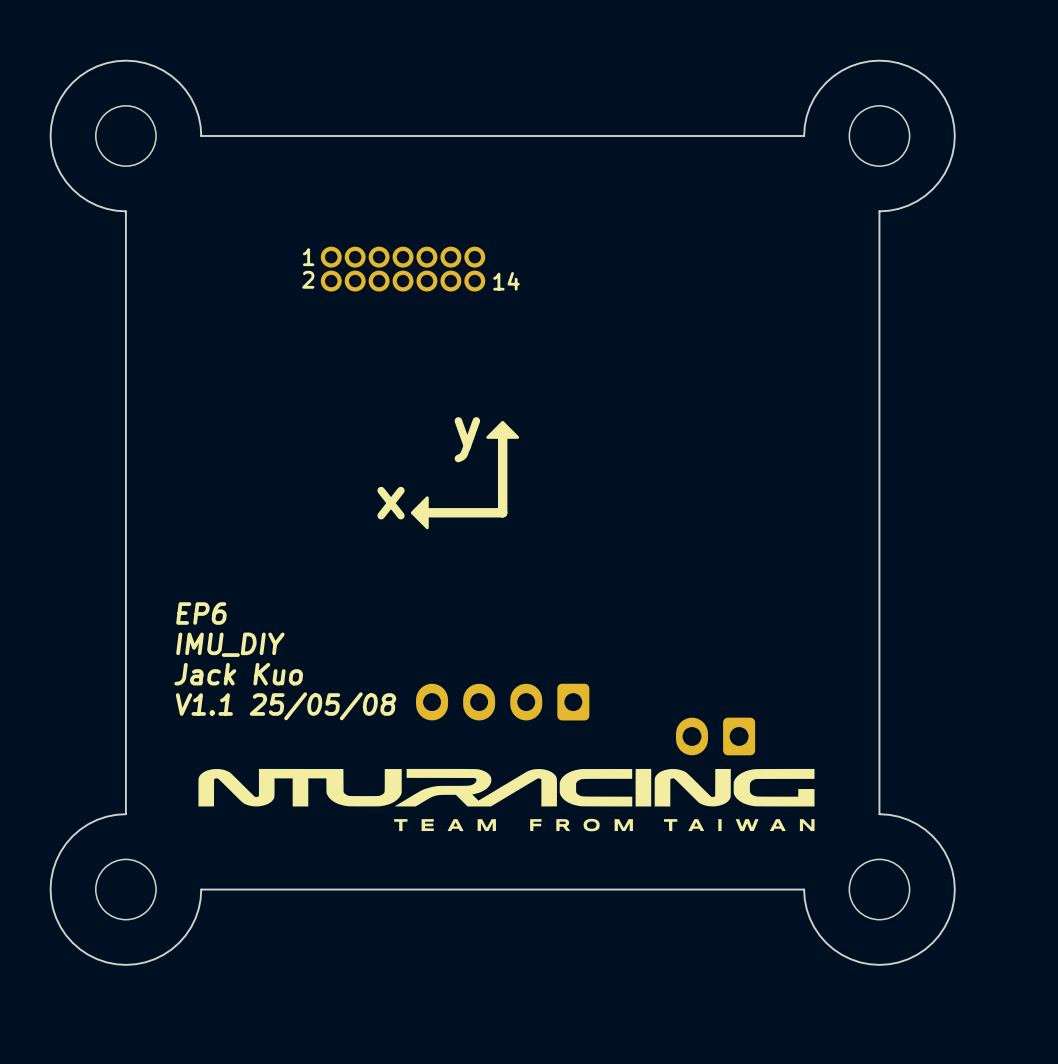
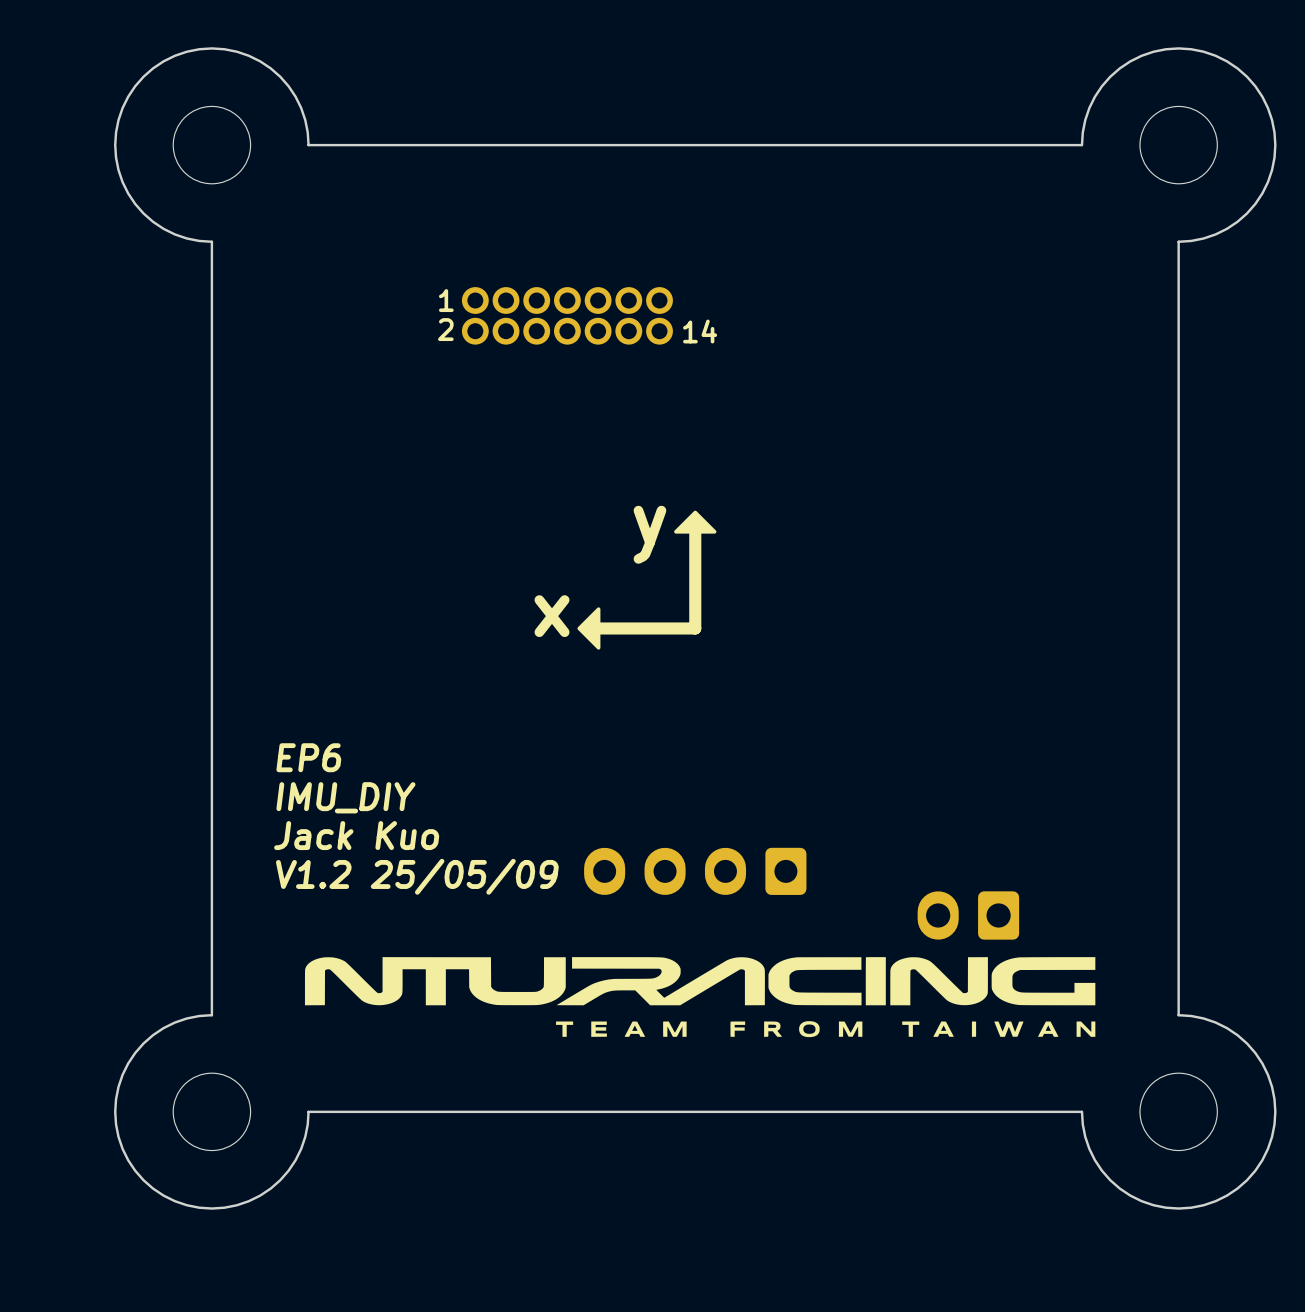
text: V1.1 25/05/08 (286, 706) -> V1.2 25/05/09 (417, 876)

